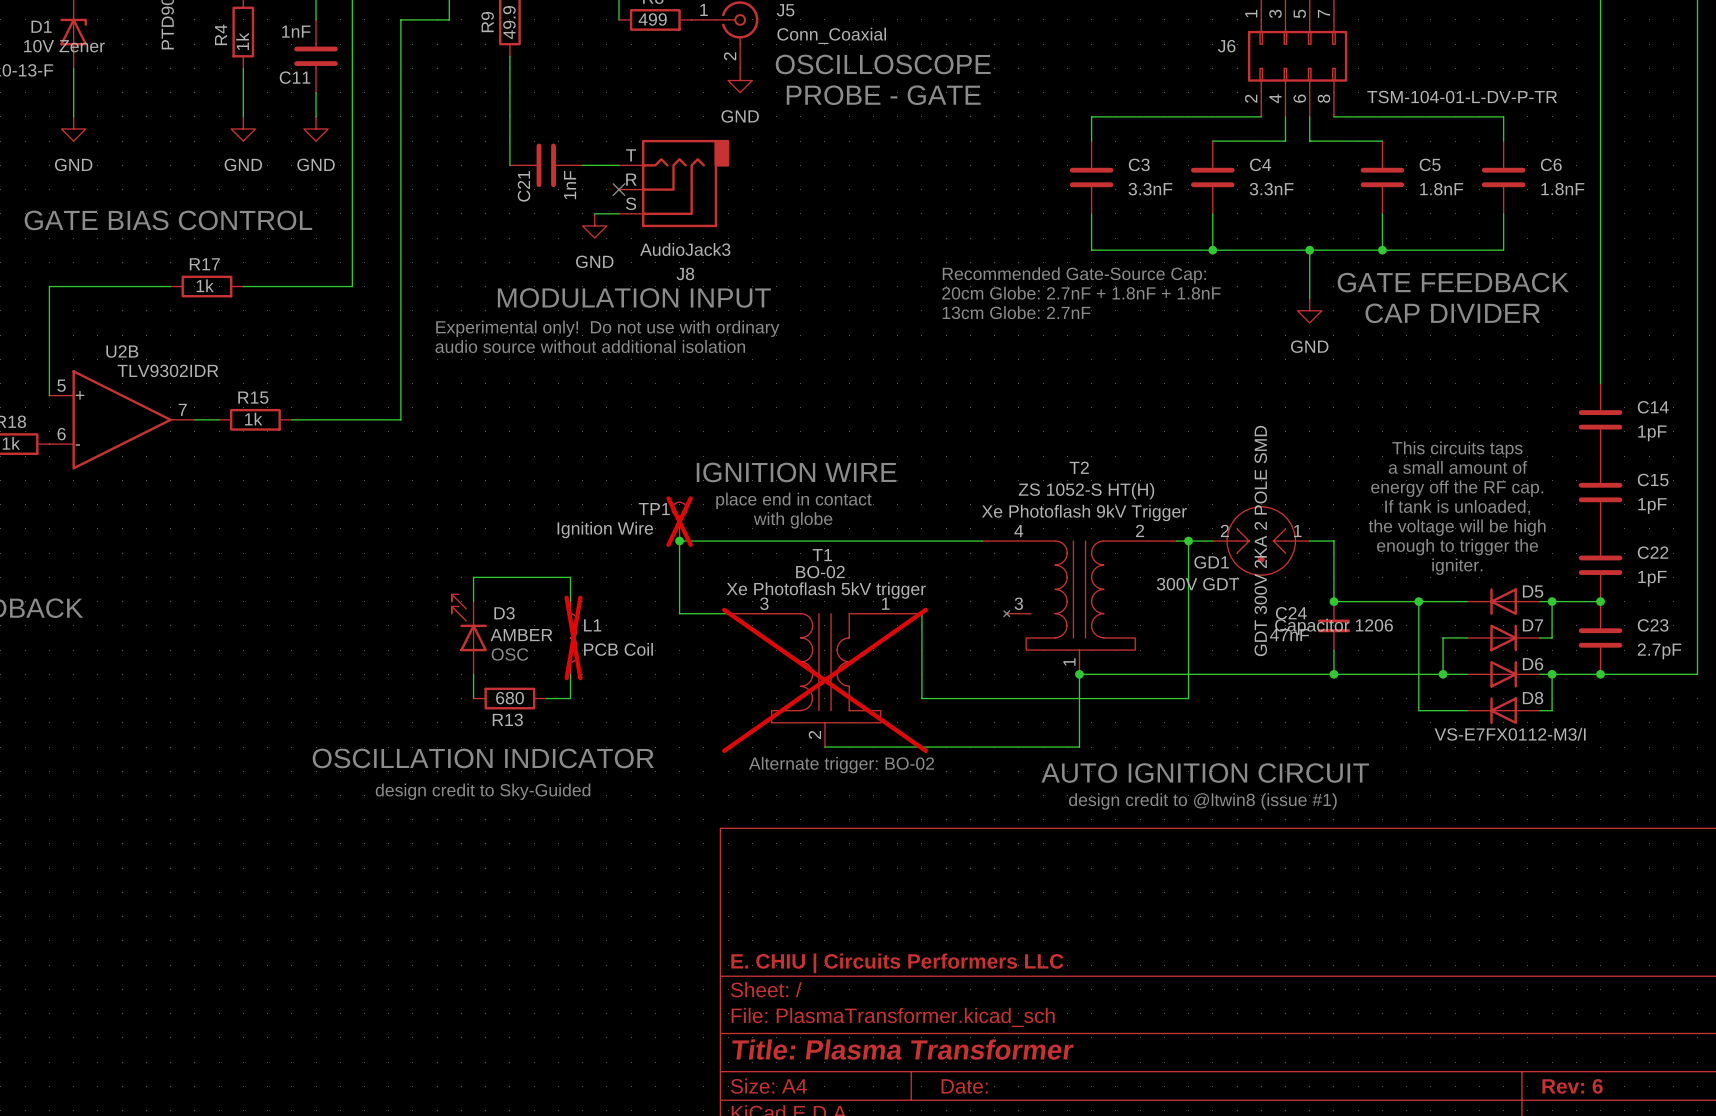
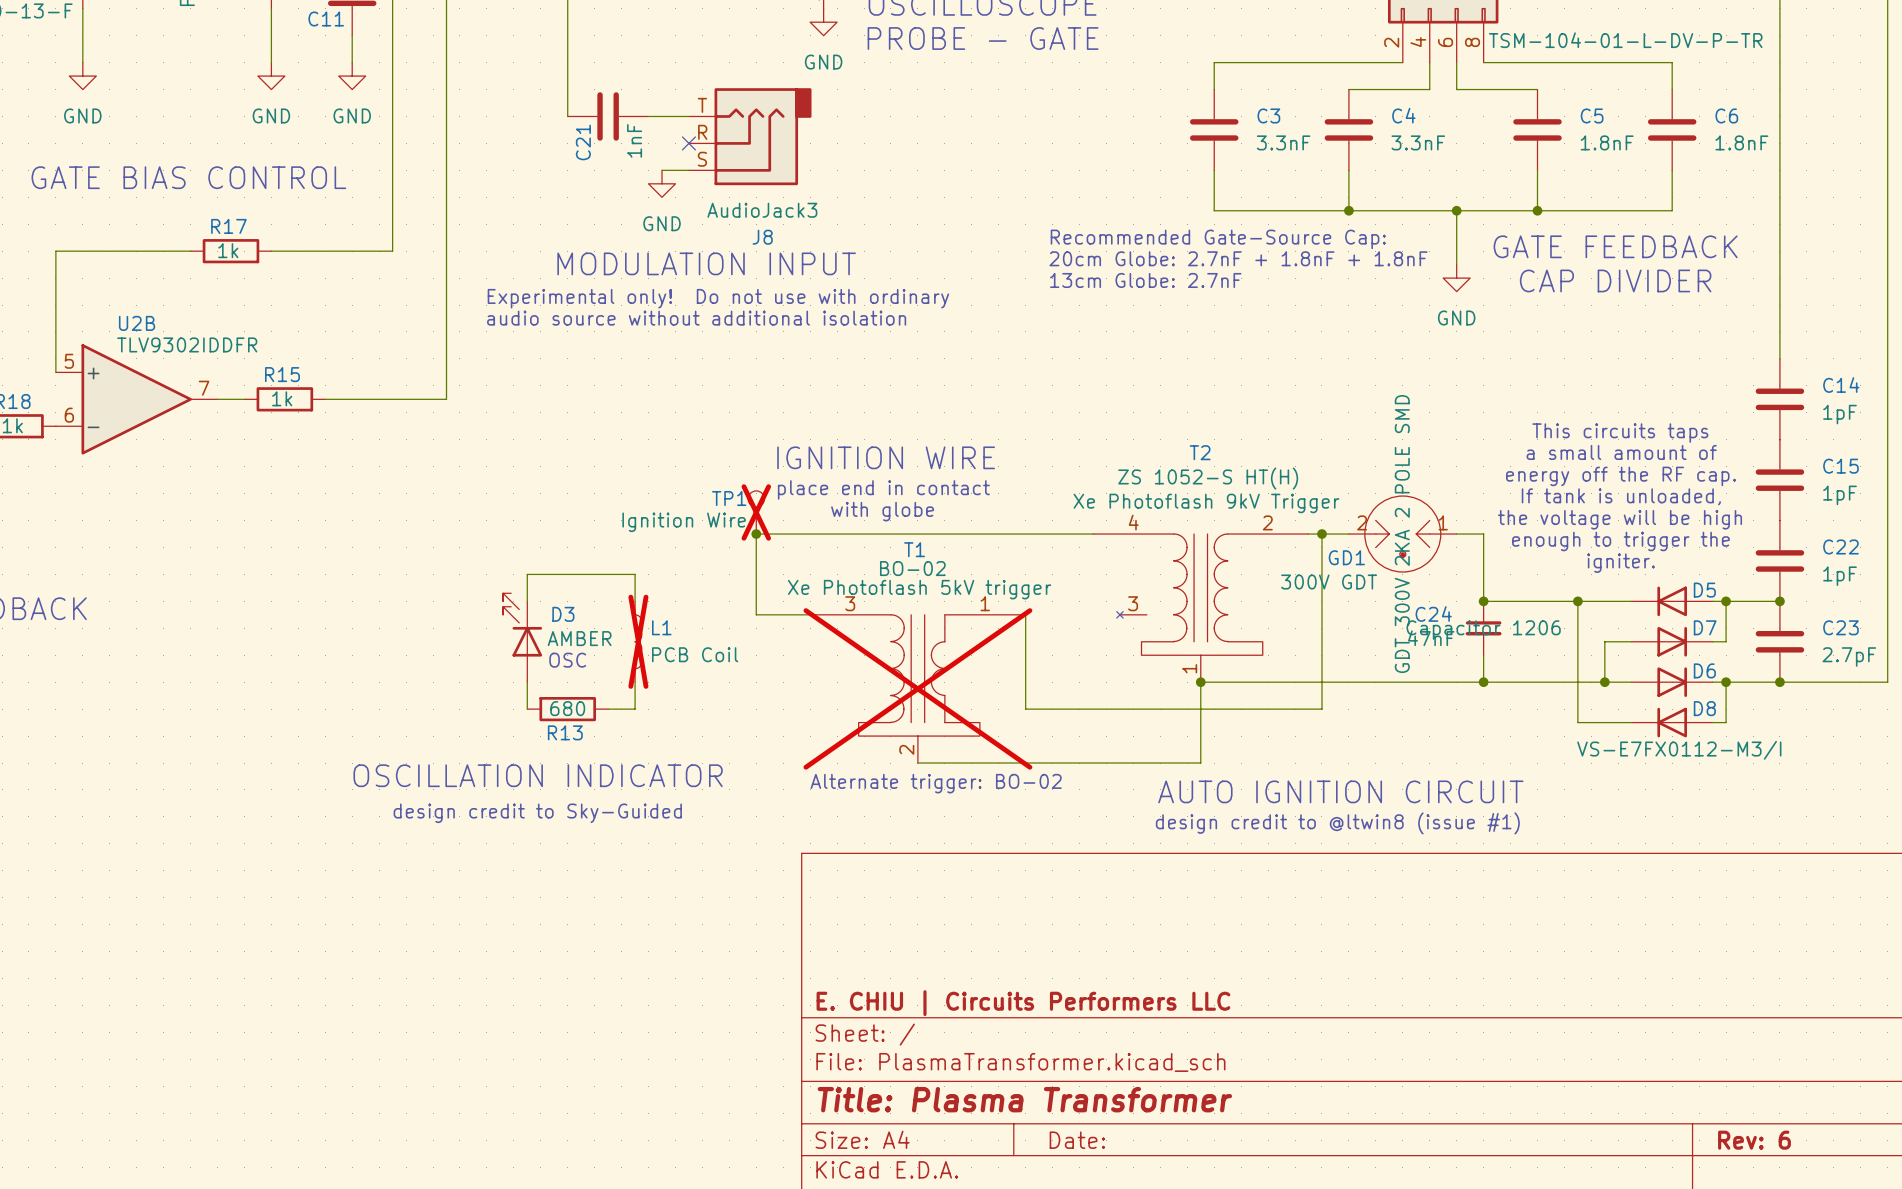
U2B value: TLV9302IDR (167, 370) -> TLV9302IDDFR (187, 344)

